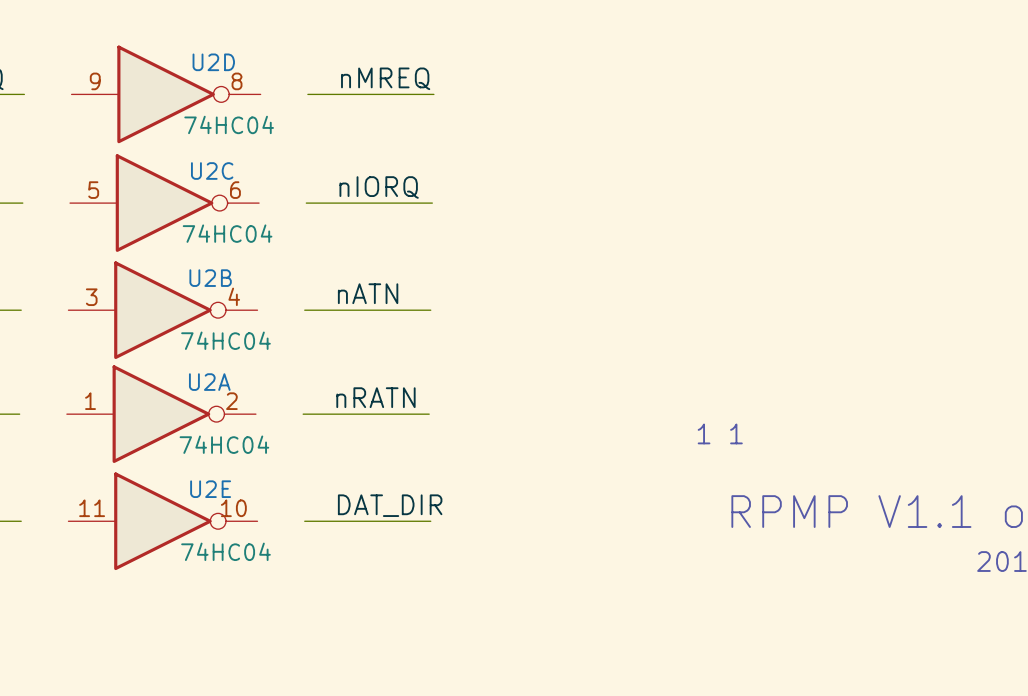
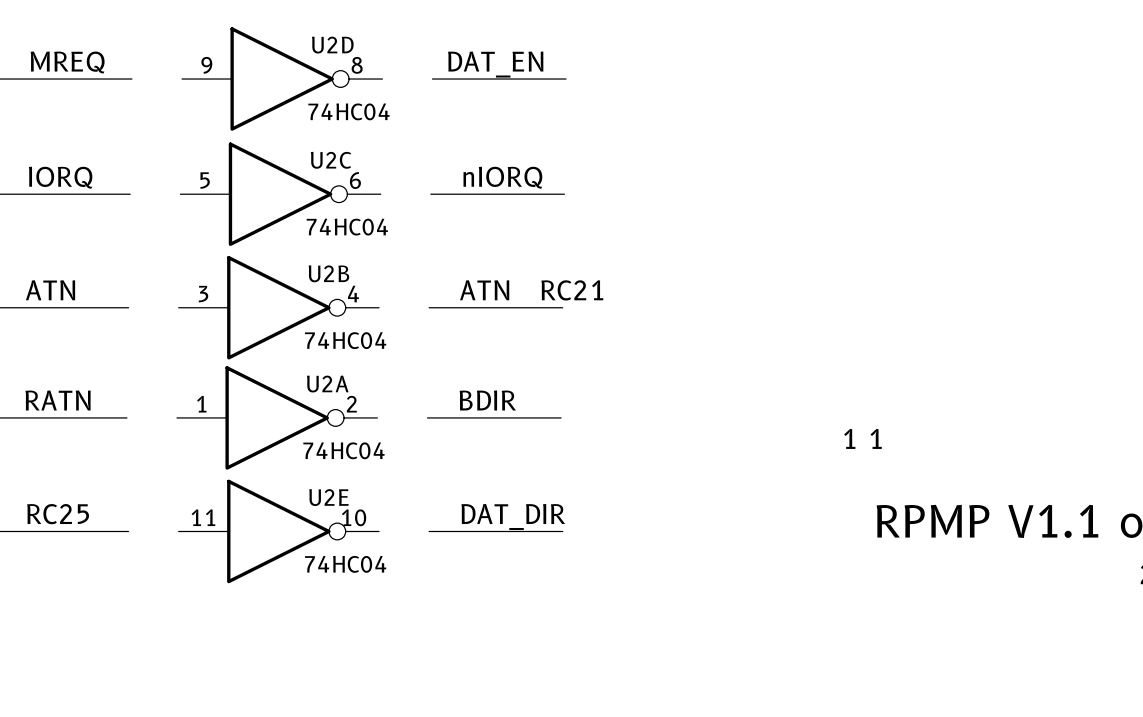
label: none -> DAT_EN (495, 64)
label: nMREQ (385, 78) -> none
label: nATN (368, 293) -> ATN (484, 290)
label: none -> RC21 (572, 290)
label: nRATN (375, 397) -> BDIR (487, 400)

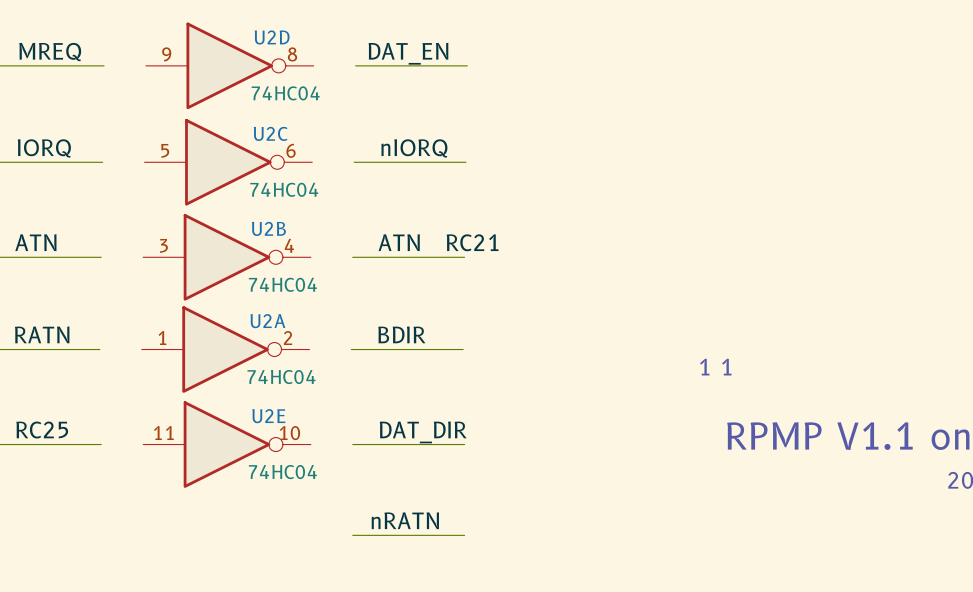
label: none -> nRATN (405, 520)
wire: none -> (352, 535) (464, 535)

